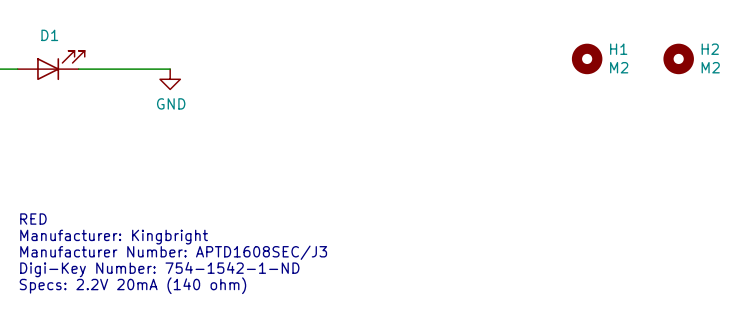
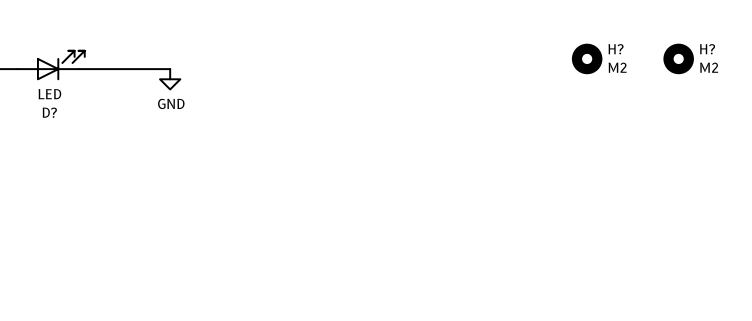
D1 name: D1 (49, 35) -> D? (49, 112)
H1 name: H1 (618, 49) -> H? (616, 49)
H2 name: H2 (710, 49) -> H? (707, 49)
D1 value: none -> LED (49, 94)
text: RED (33, 219) -> none
text: Manufacturer: Kingbright (114, 237) -> none
text: Manufacturer Number: APTD1608SEC/J3 (173, 252) -> none
text: Digi-Key Number: 754-1542-1-ND (159, 269) -> none
text: Specs: 2.2V 20mA (140 ohm) (132, 285) -> none

